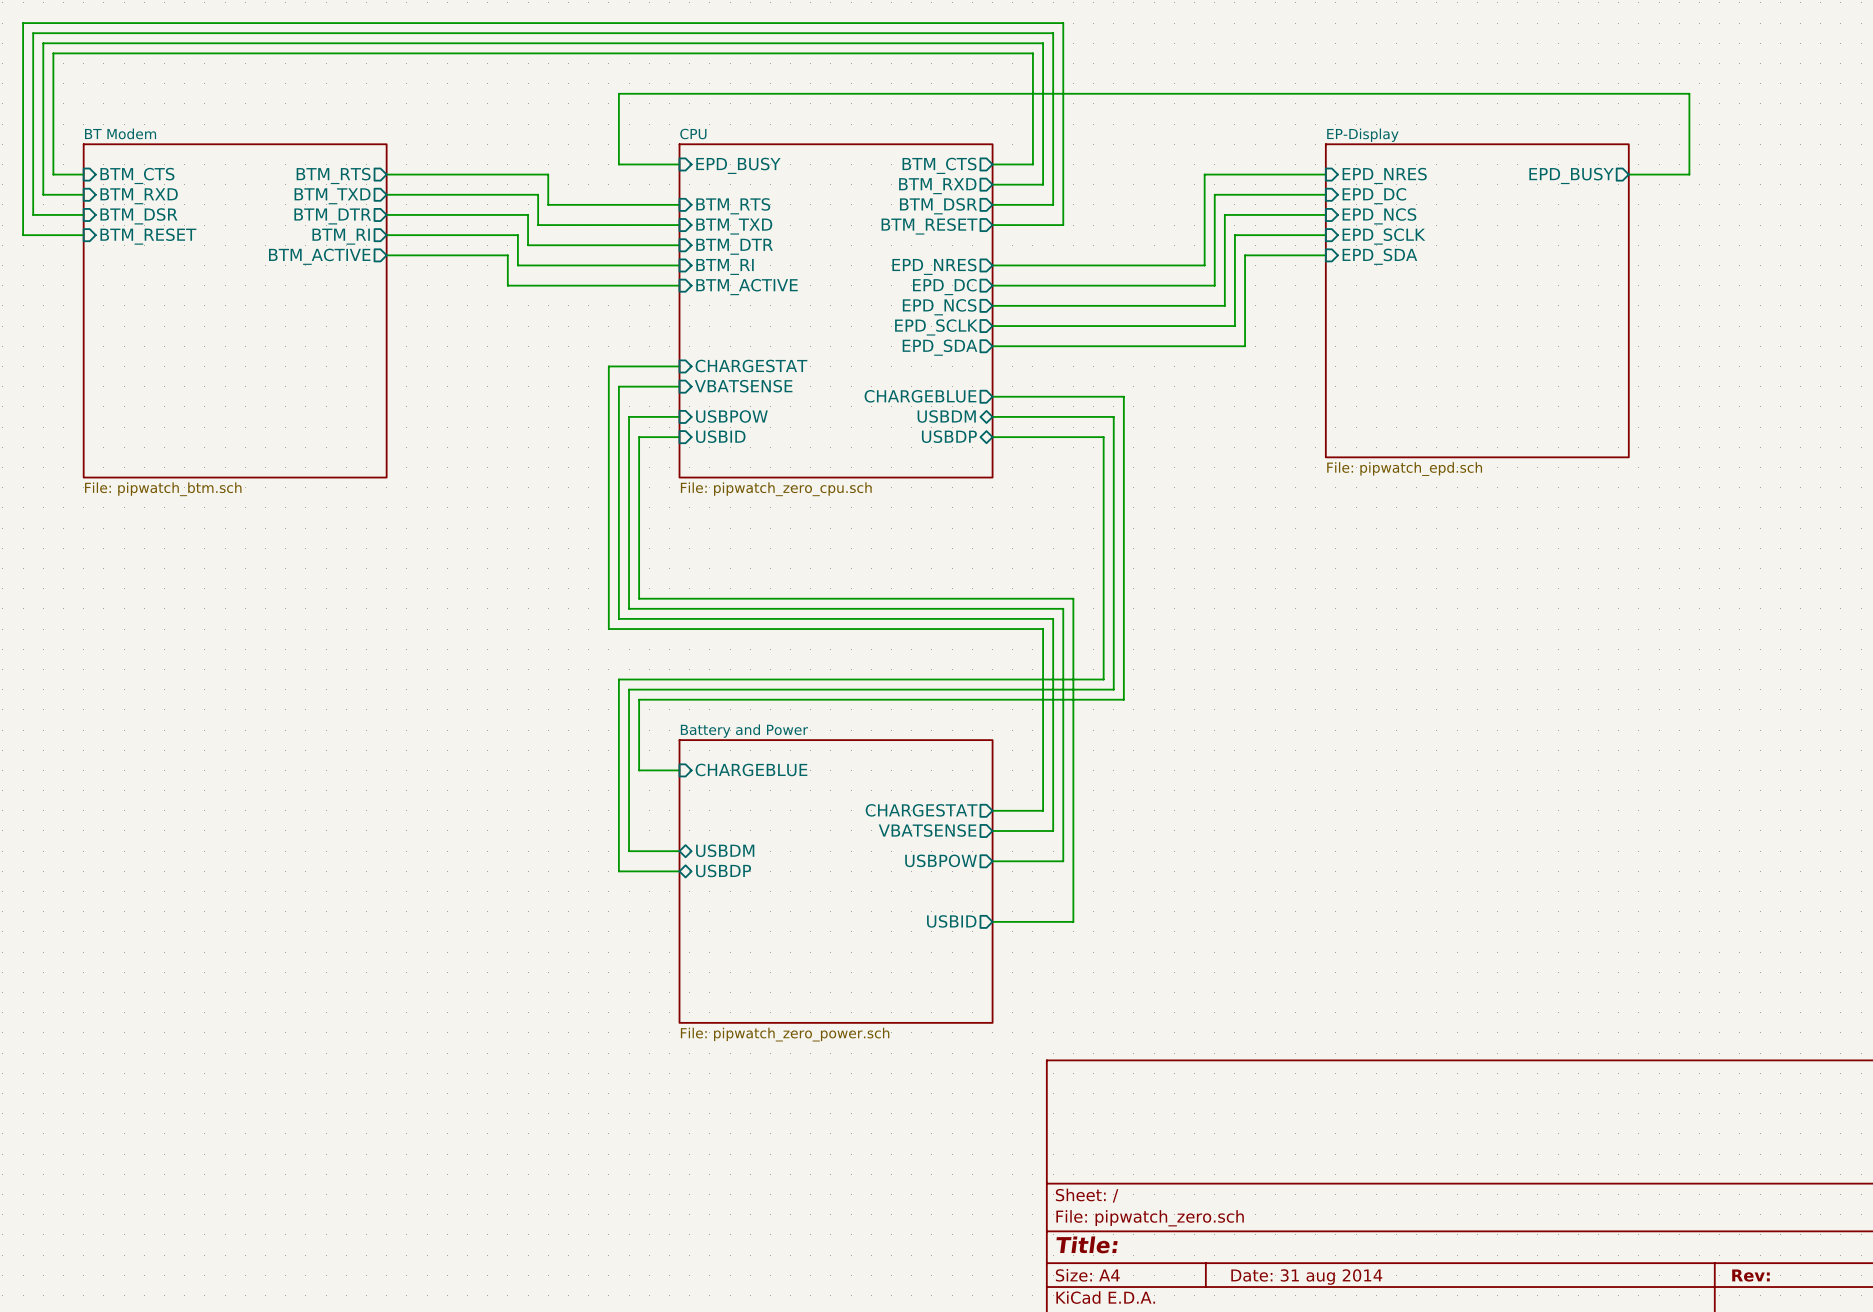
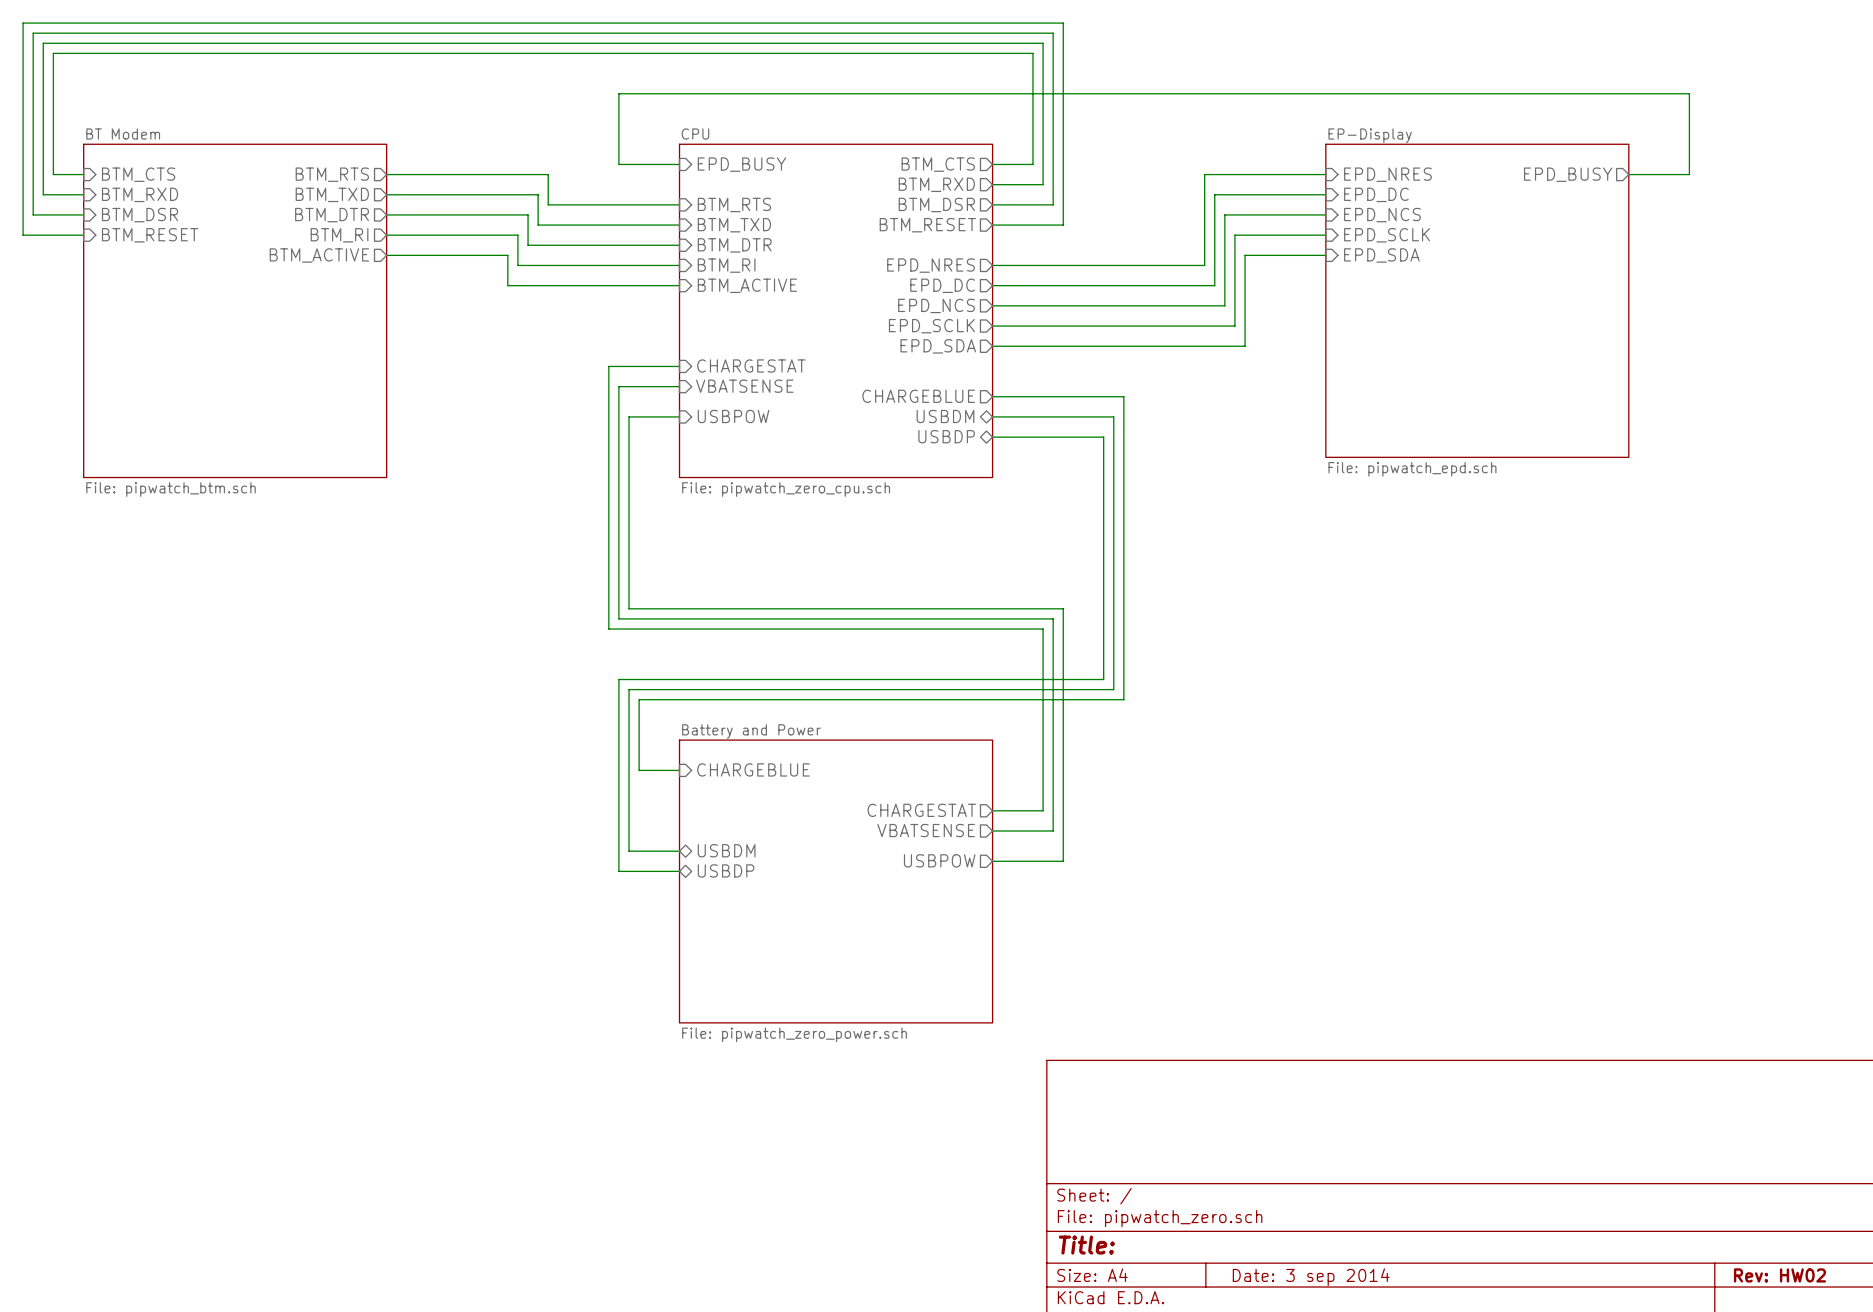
sheet pin: USBID (720, 436) -> none
wire: (679, 437) (639, 437) (639, 598) (1073, 598) (1073, 921) (992, 921) -> none
sheet pin: USBID (951, 921) -> none
title block: Rev: (1750, 1275) -> Rev: HW02 (1779, 1275)
title block: Date: 31 aug 2014 (1306, 1277) -> Date: 3 sep 2014 (1311, 1277)

